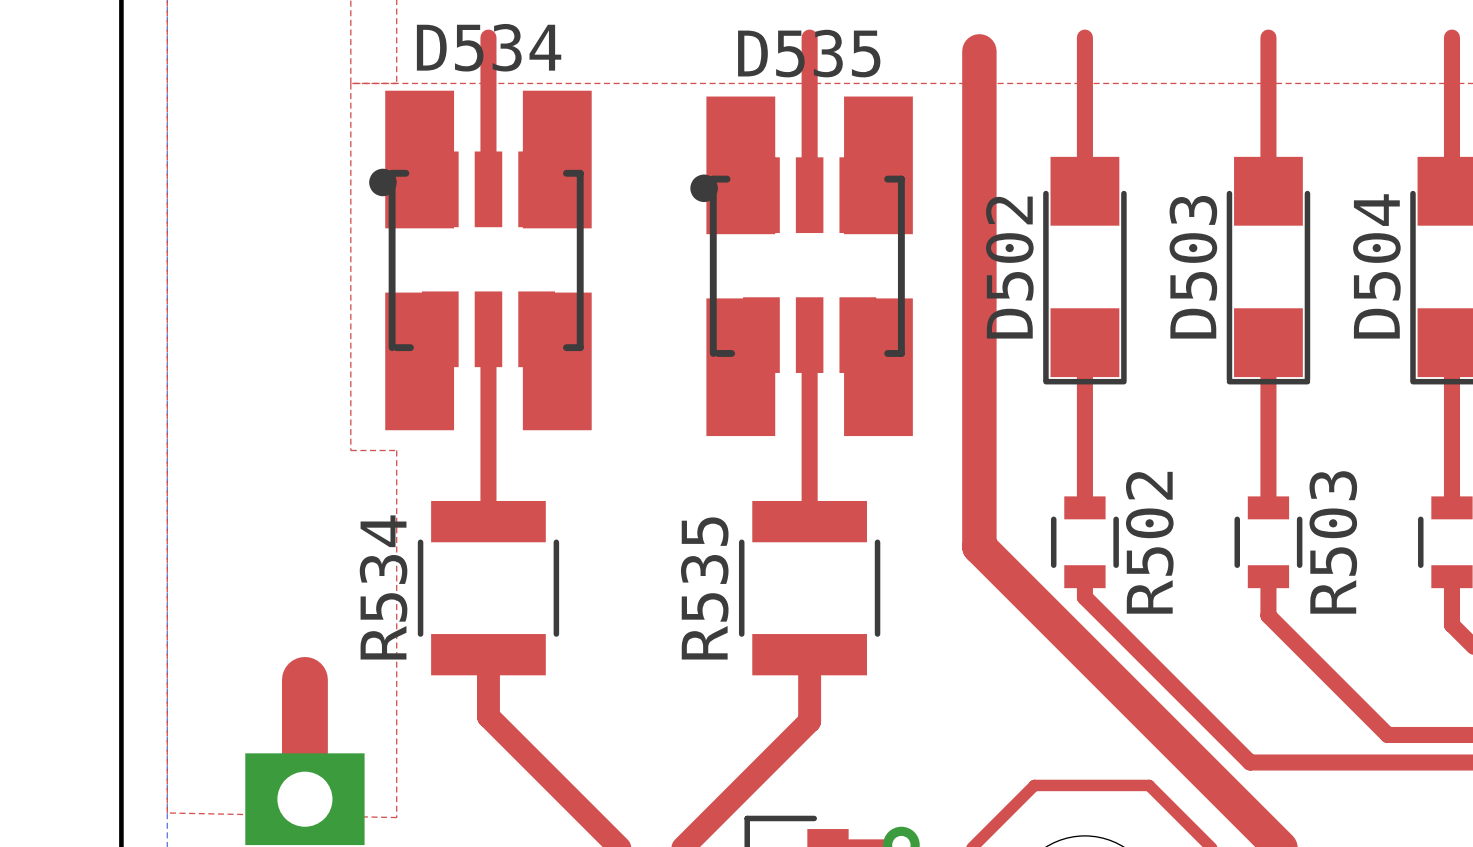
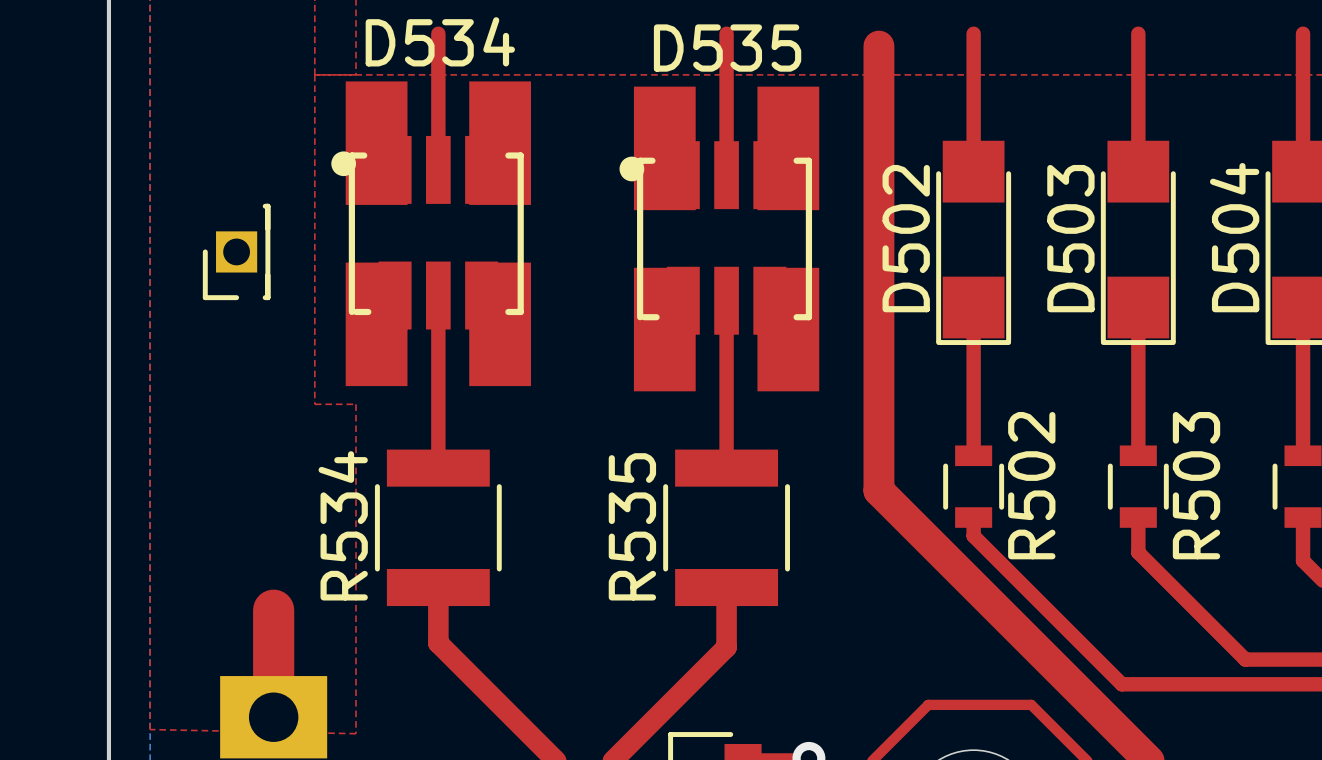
part: none -> (236, 251)

